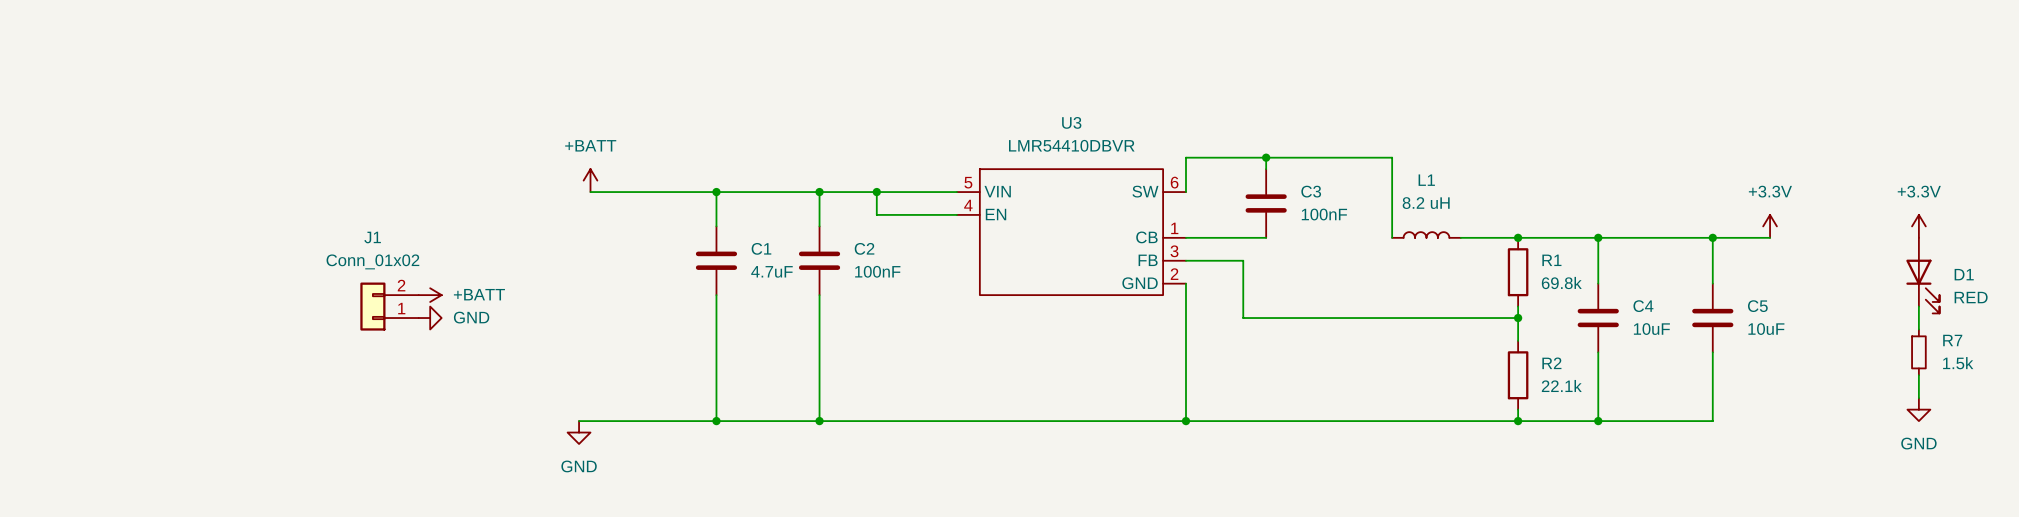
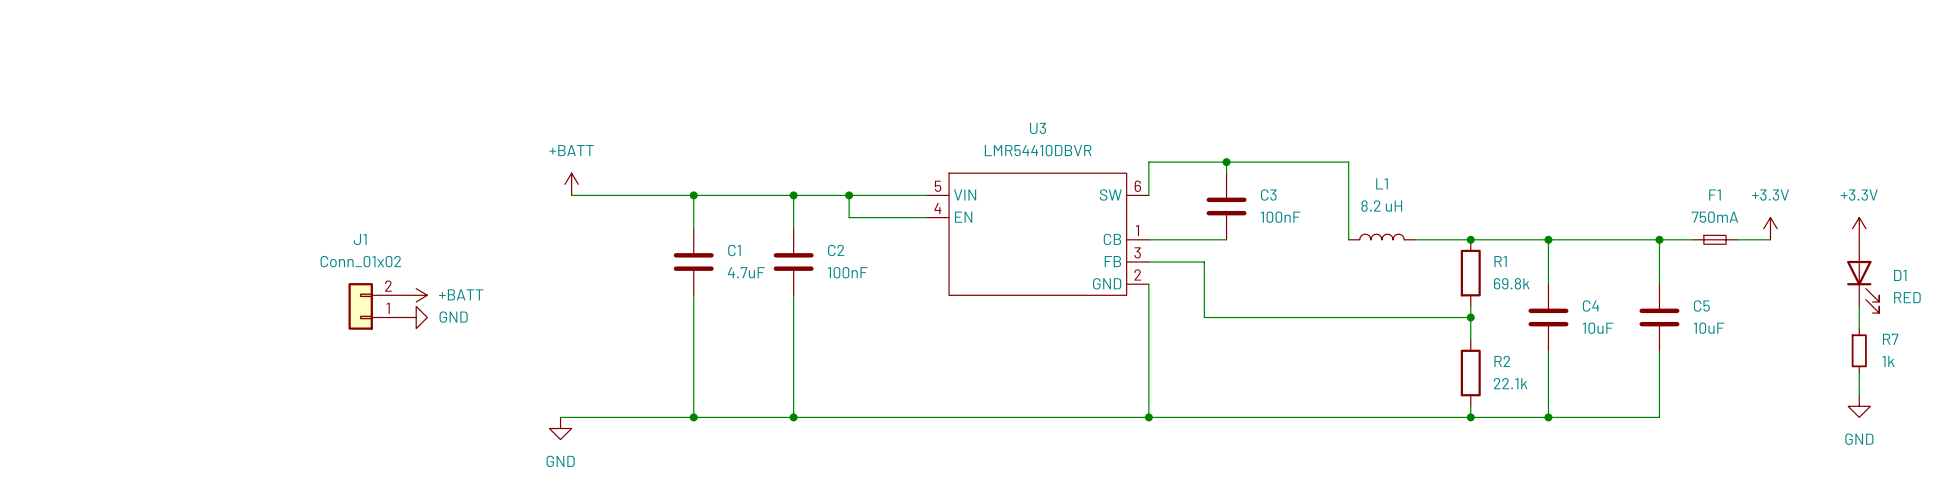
power symbol position: +3.3V (1770, 226) -> +3.3V (1770, 228)
F1: none -> 750mA (1714, 239)
wire: none -> (1737, 239) (1770, 239)
R7 value: 1.5k (1958, 363) -> 1k (1888, 361)

